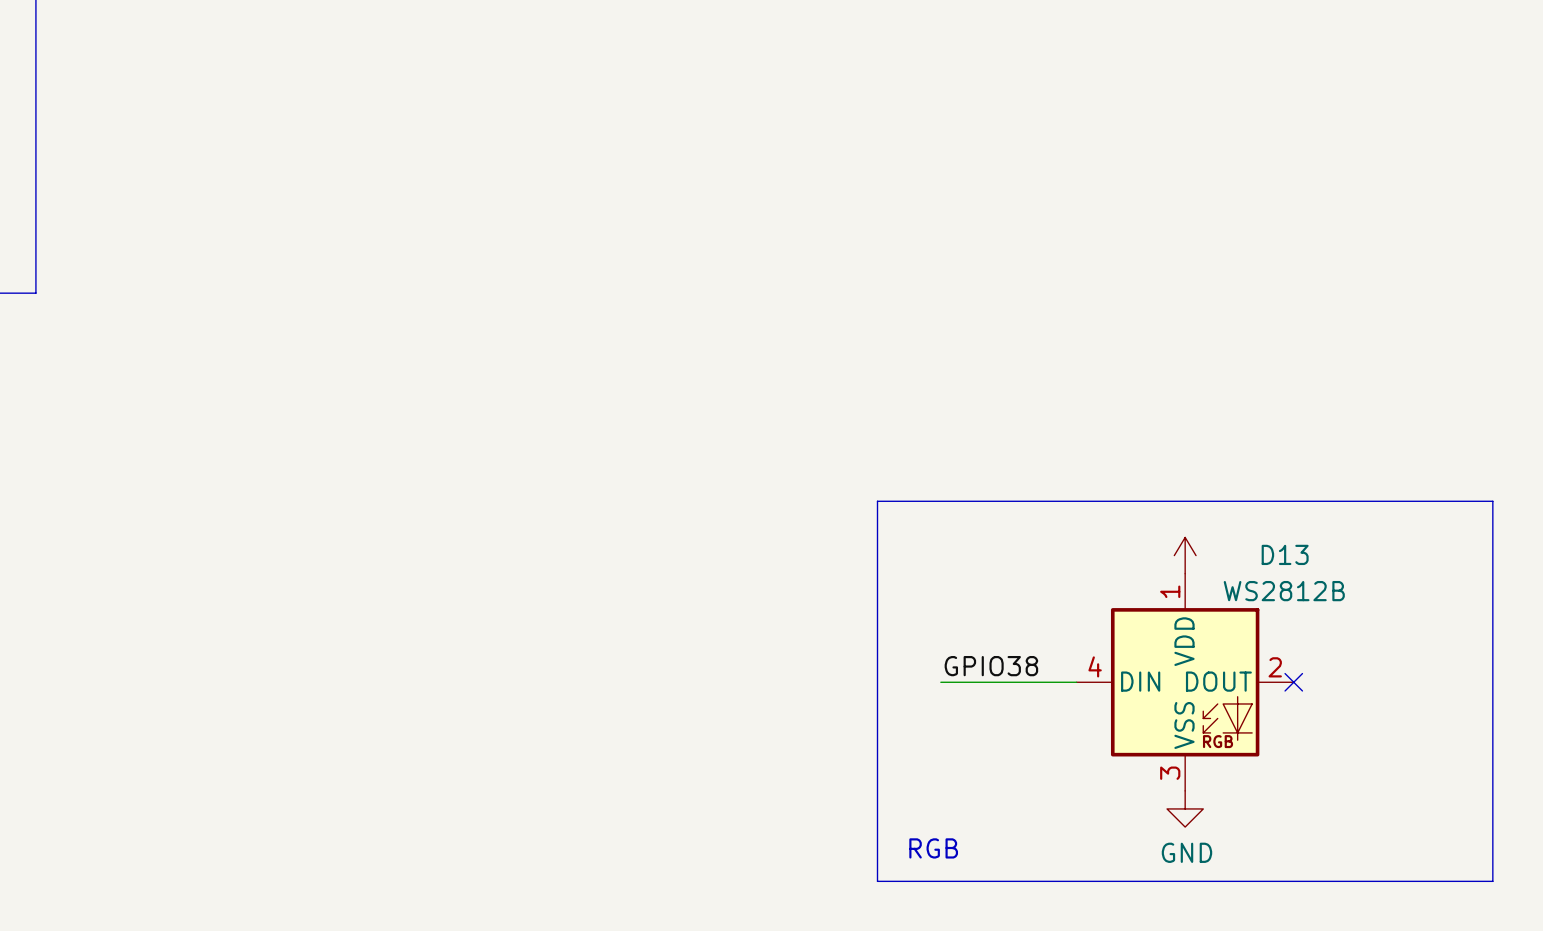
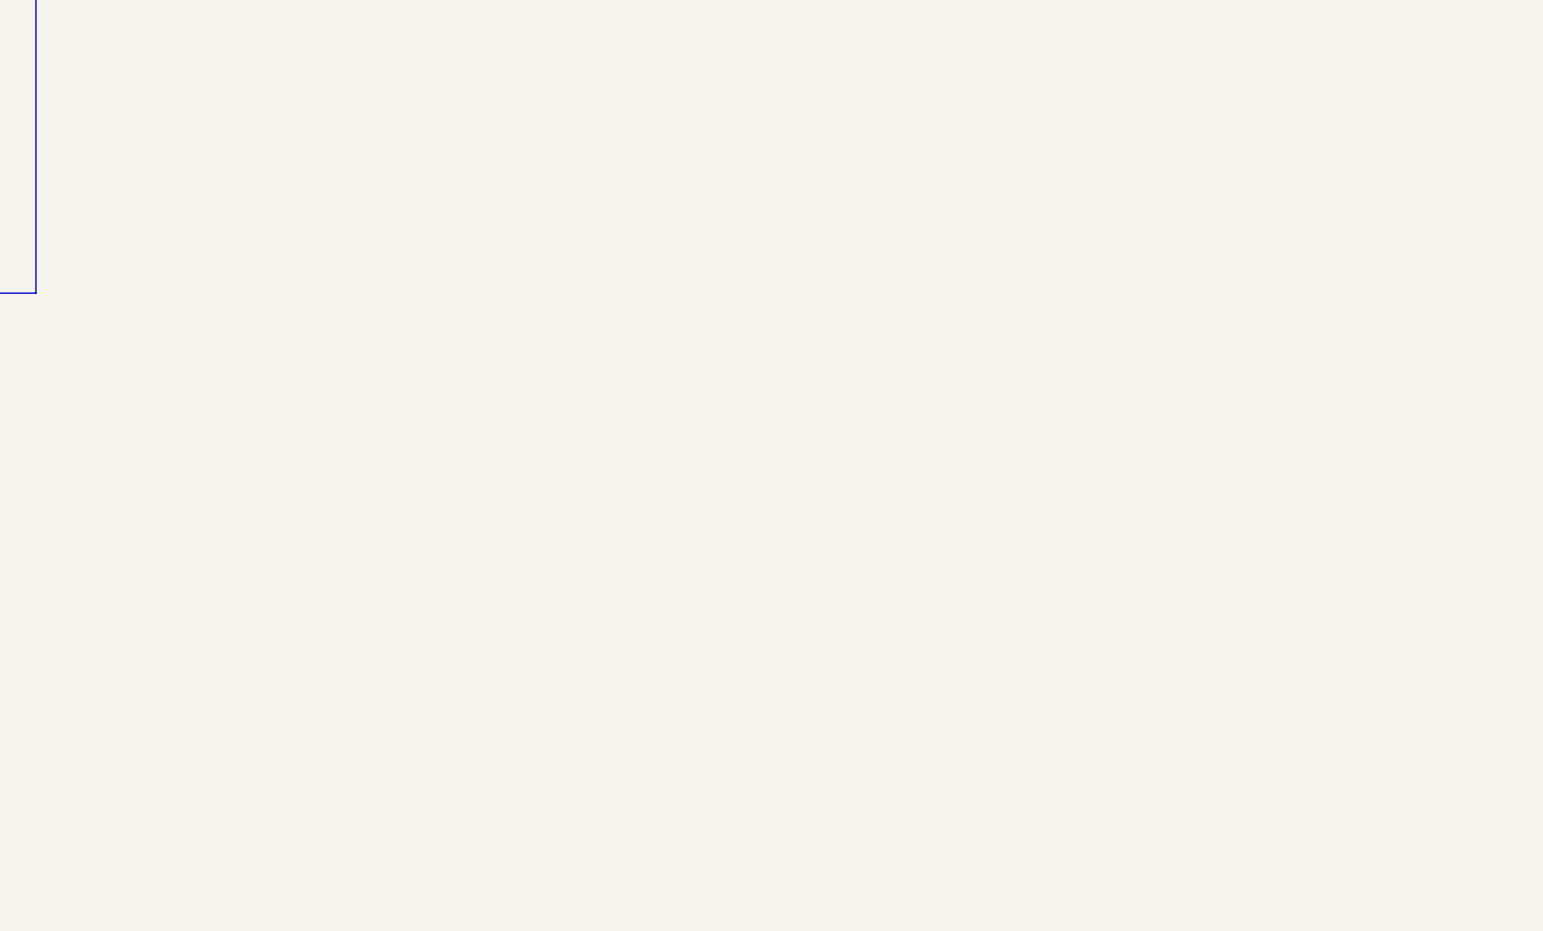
line: (877, 501) (1492, 501) (1492, 881) (877, 881) (877, 501) -> none
power symbol: (1185, 555) -> none
label: GPIO38 (991, 666) -> none
wire: (940, 682) (1076, 682) -> none
D13: WS2812B (1185, 682) -> none
no-connect mark: (1293, 682) -> none
power symbol: GND (1185, 808) -> none
text: RGB (933, 848) -> none

